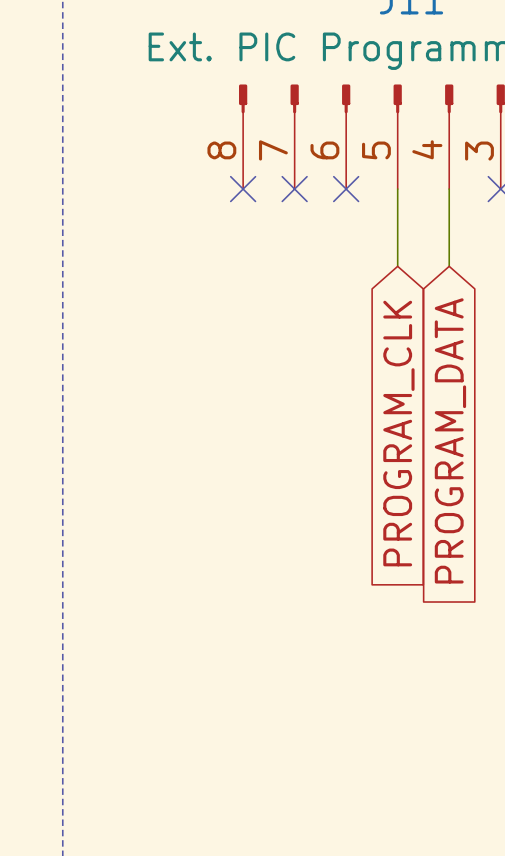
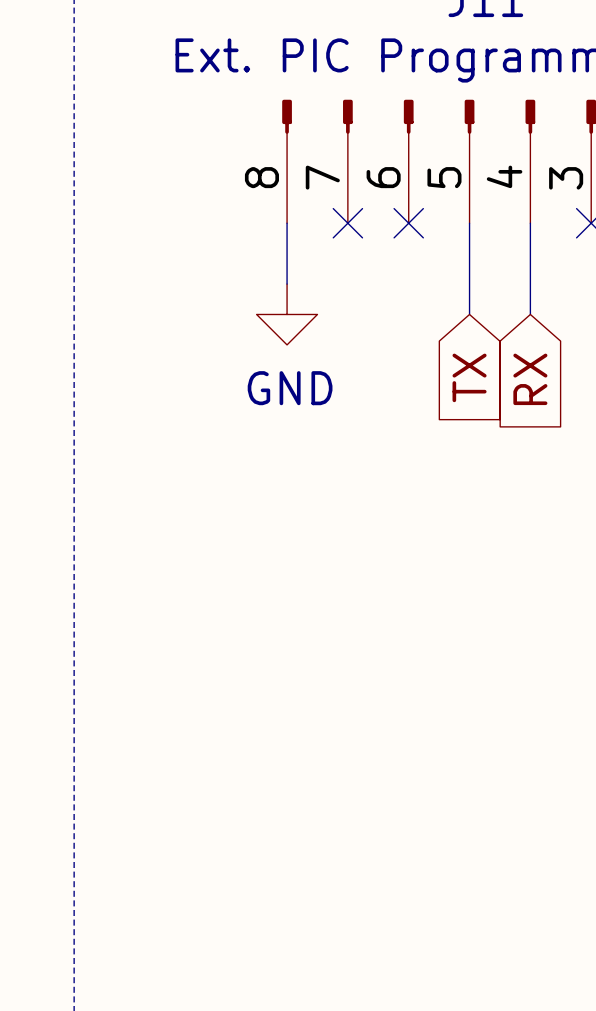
wire: none -> (287, 223) (287, 284)
no-connect mark: (243, 189) -> none
power symbol: none -> GND (287, 314)
global label: PROGRAM_CLK (398, 433) -> TX (469, 377)
global label: PROGRAM_DATA (450, 440) -> RX (530, 379)

